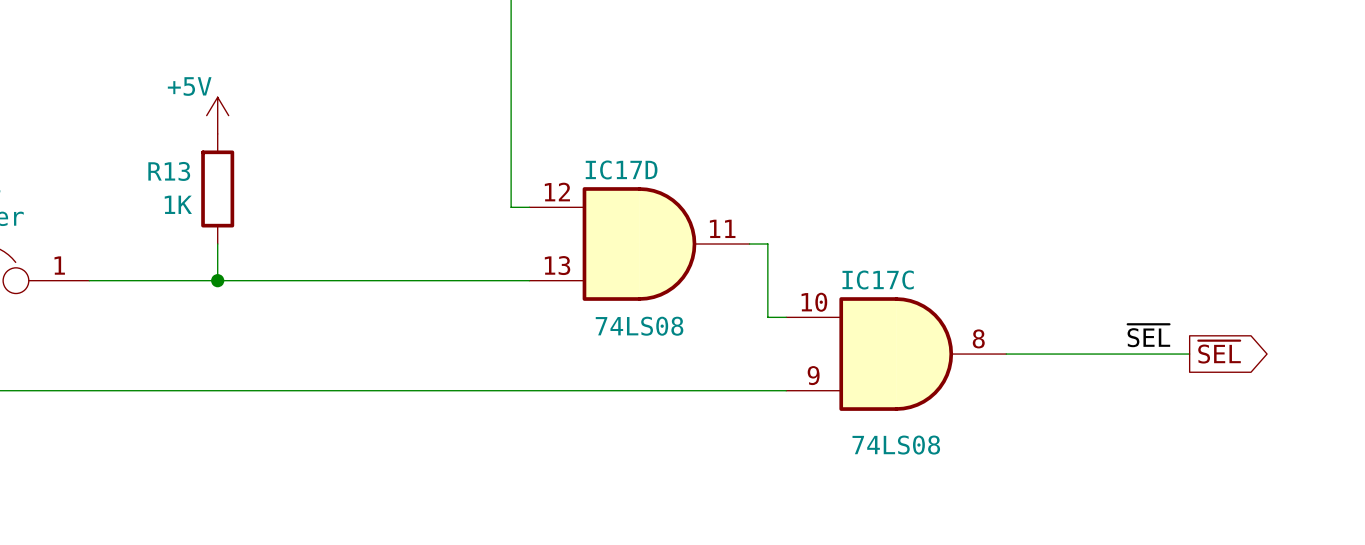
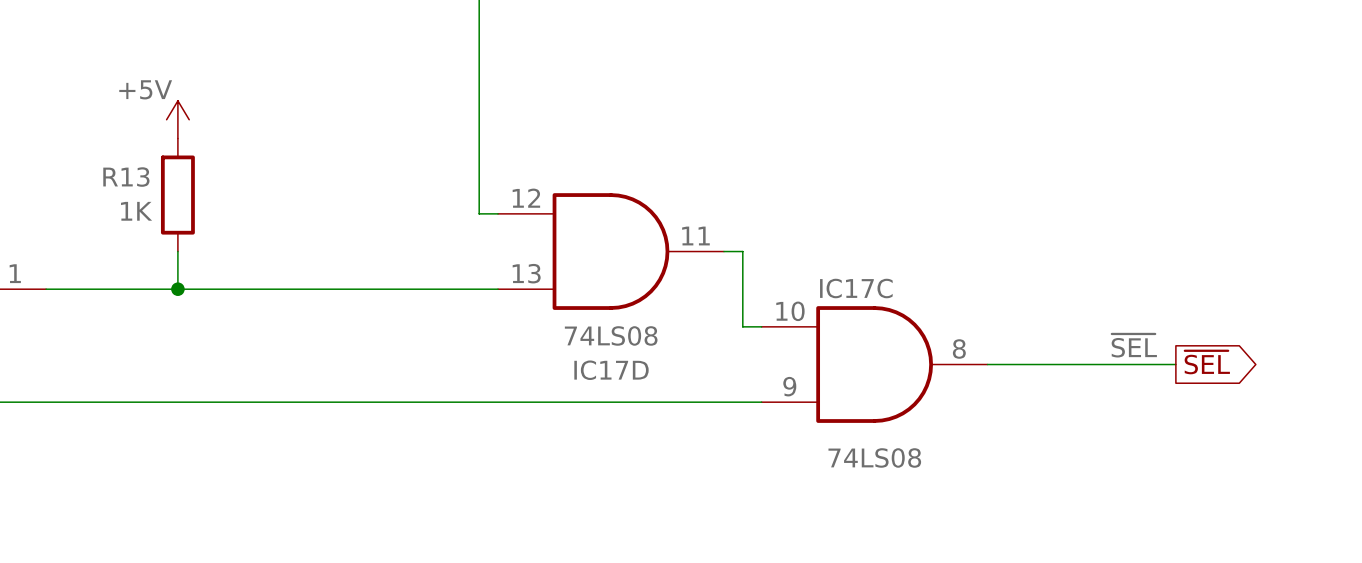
IC17D name position: IC17D (621, 169) -> IC17D (611, 370)

